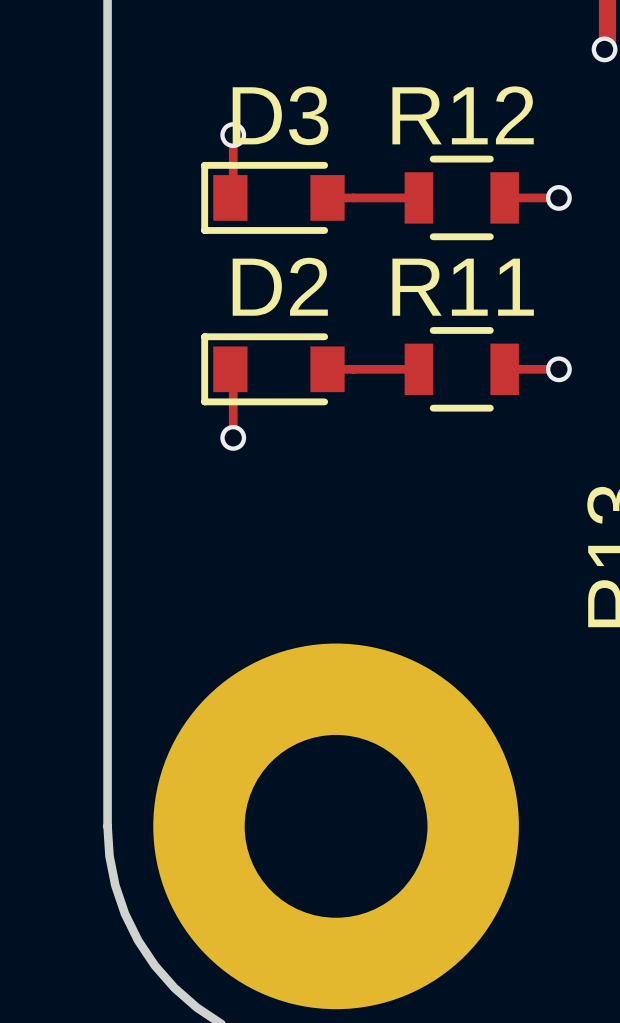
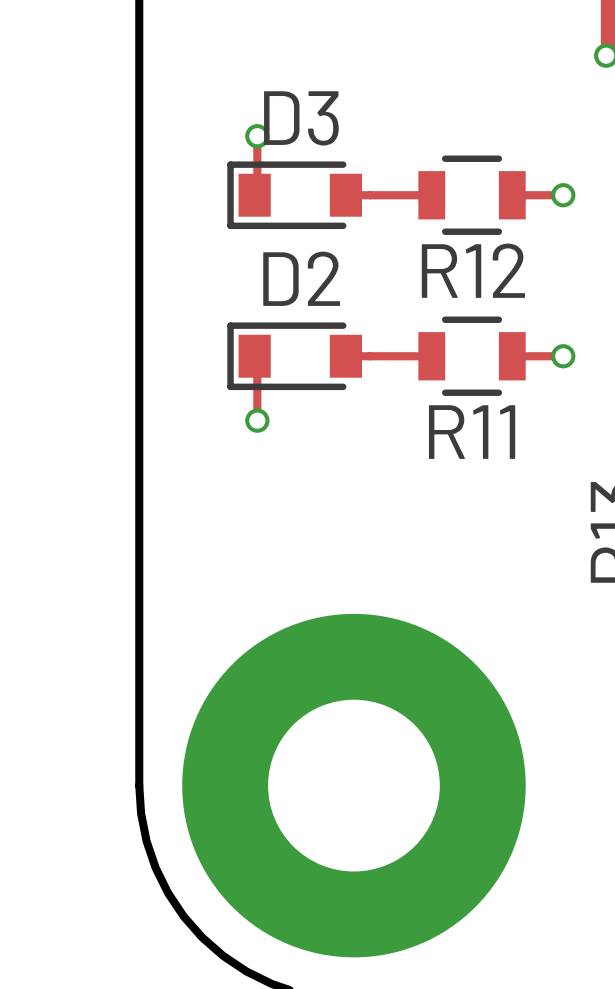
R12 name position: R12 (463, 115) -> R12 (473, 270)
R11 name position: R11 (463, 287) -> R11 (472, 432)

